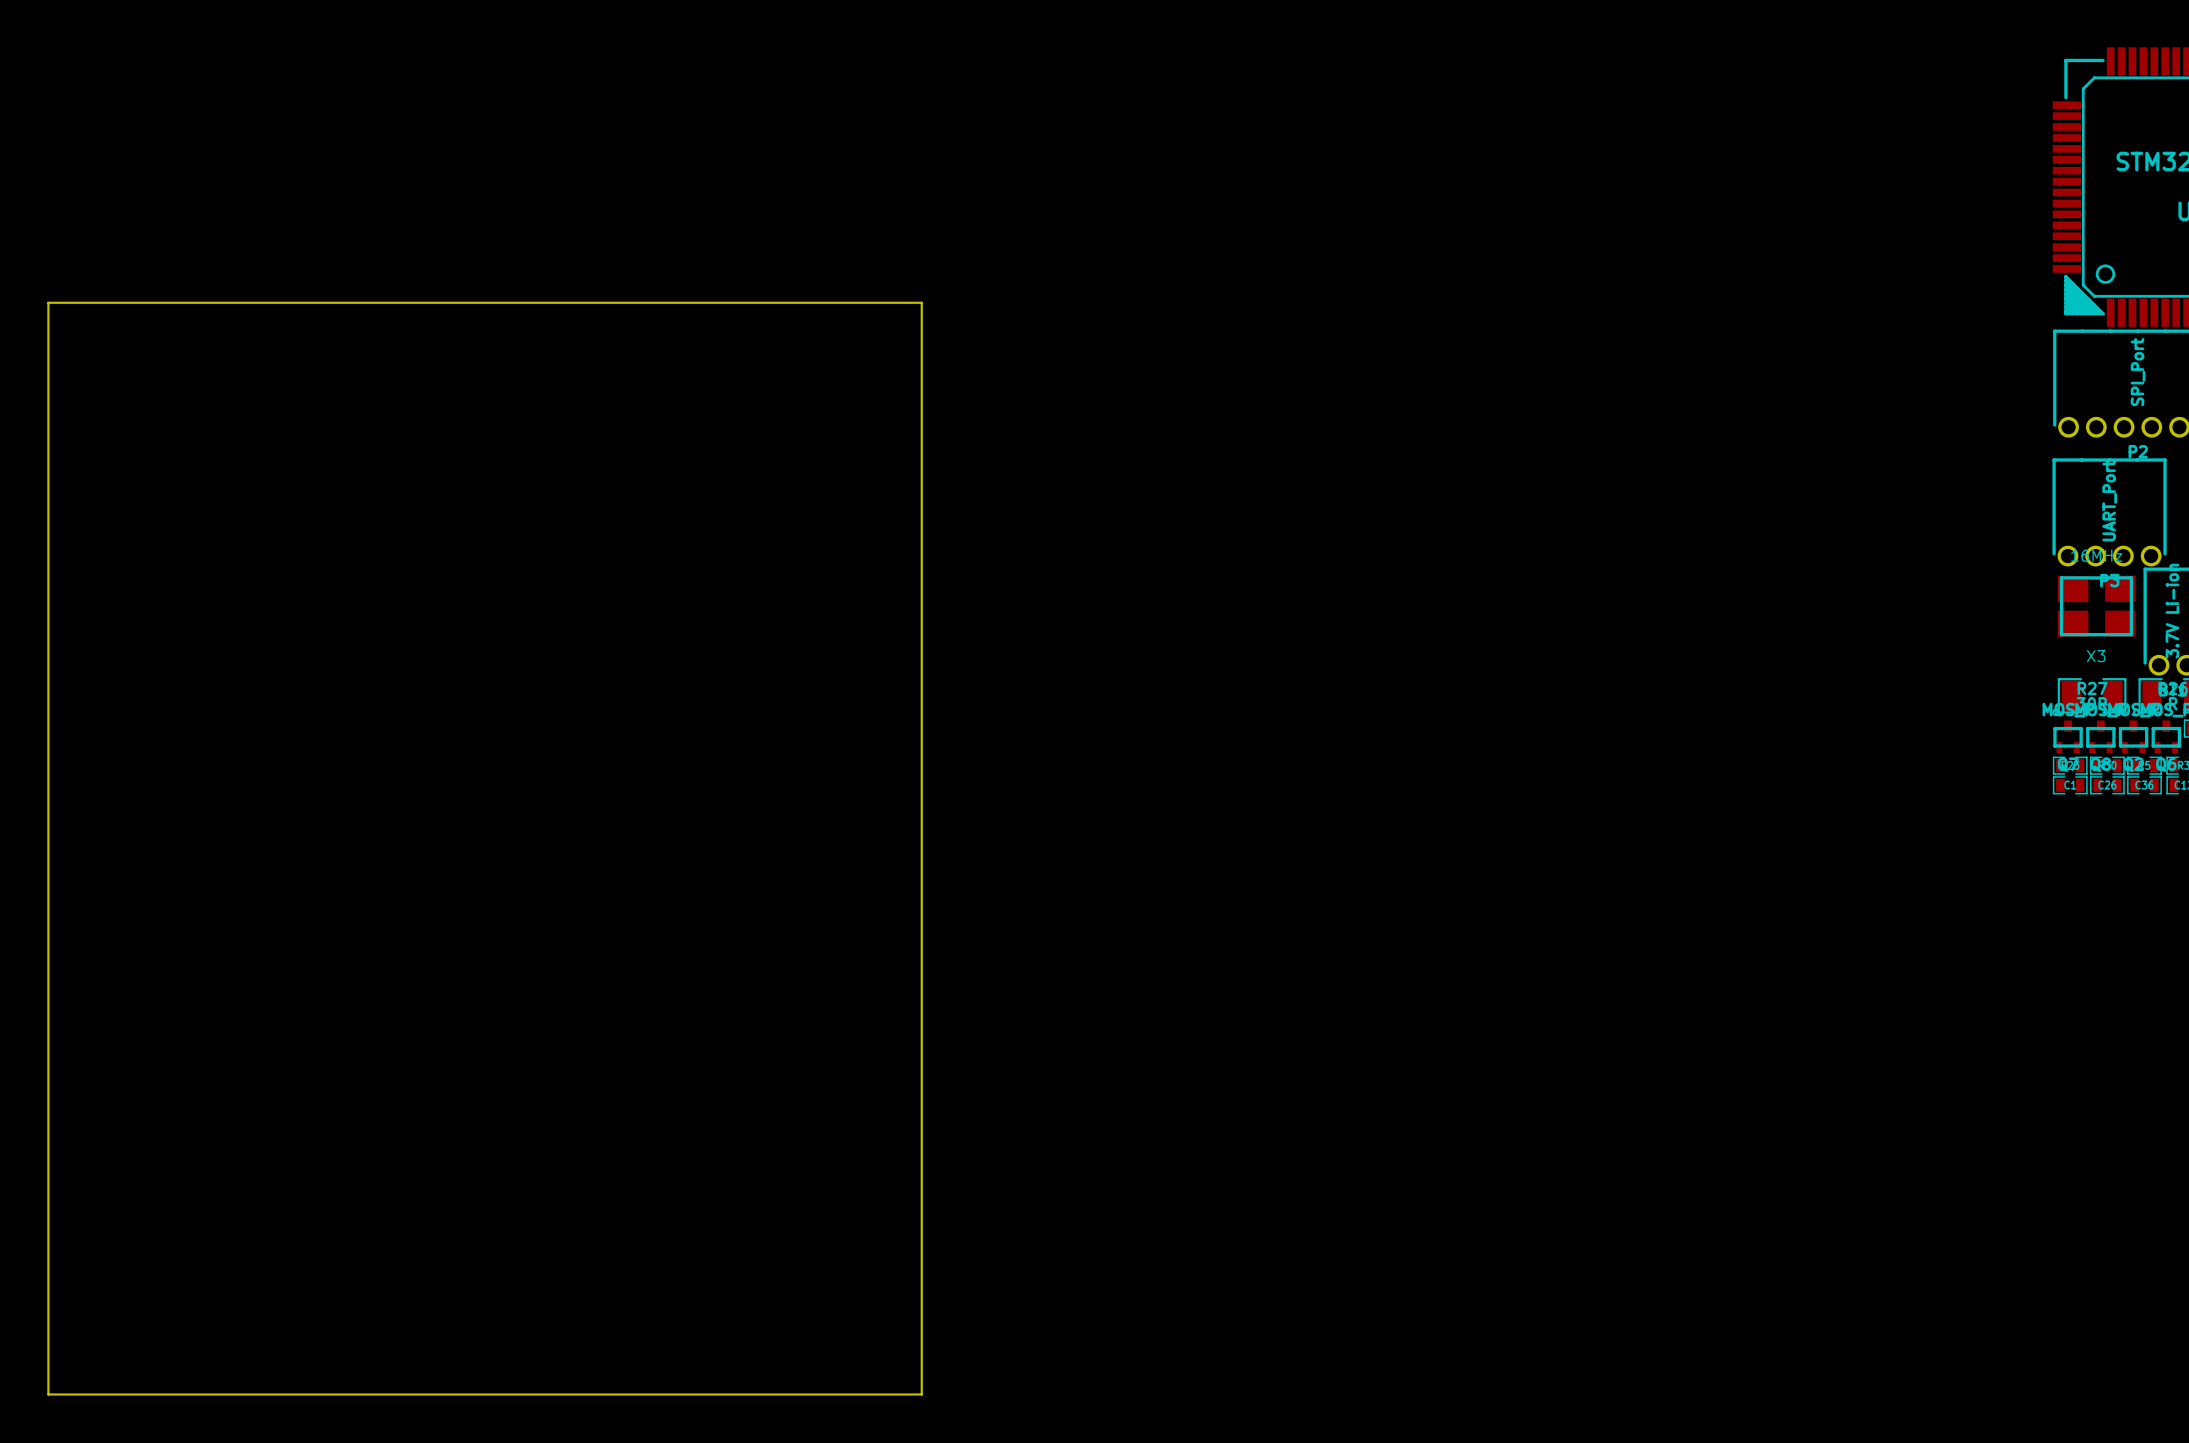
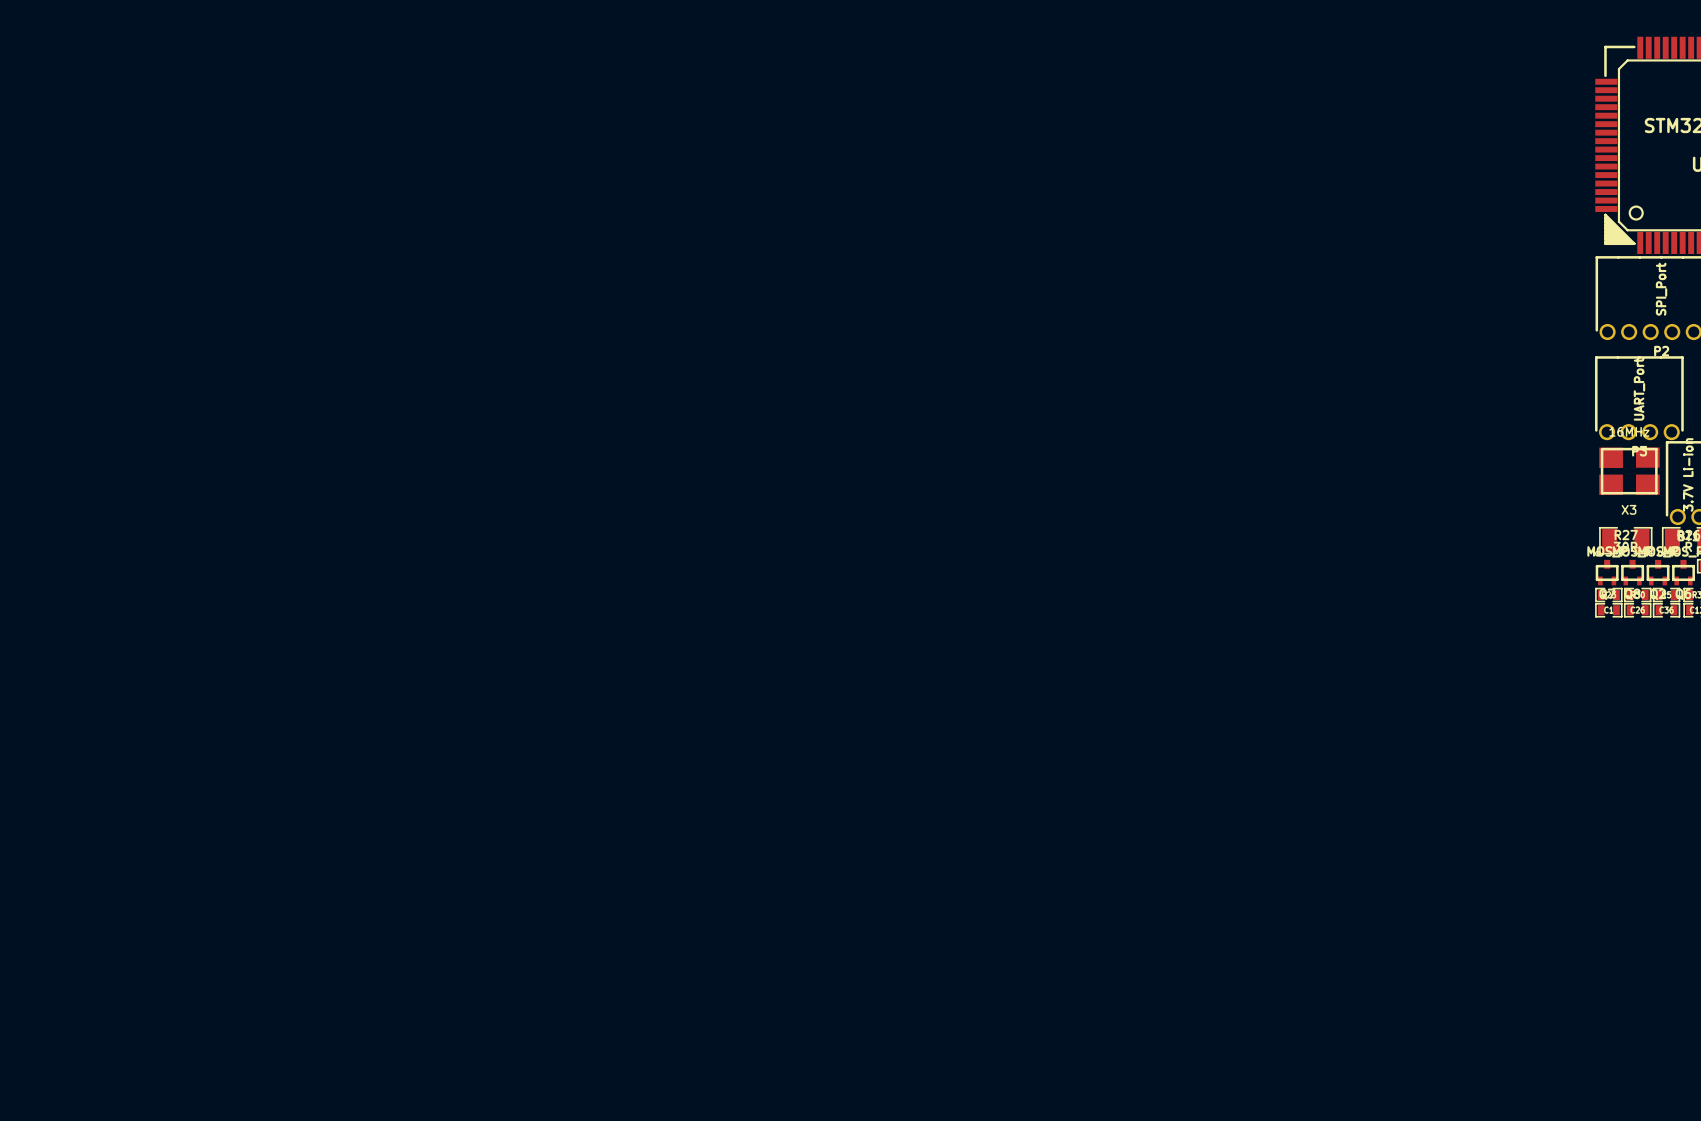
board edge: (48, 302) (48, 1394) (921, 1394) (921, 302) (48, 302) -> none

